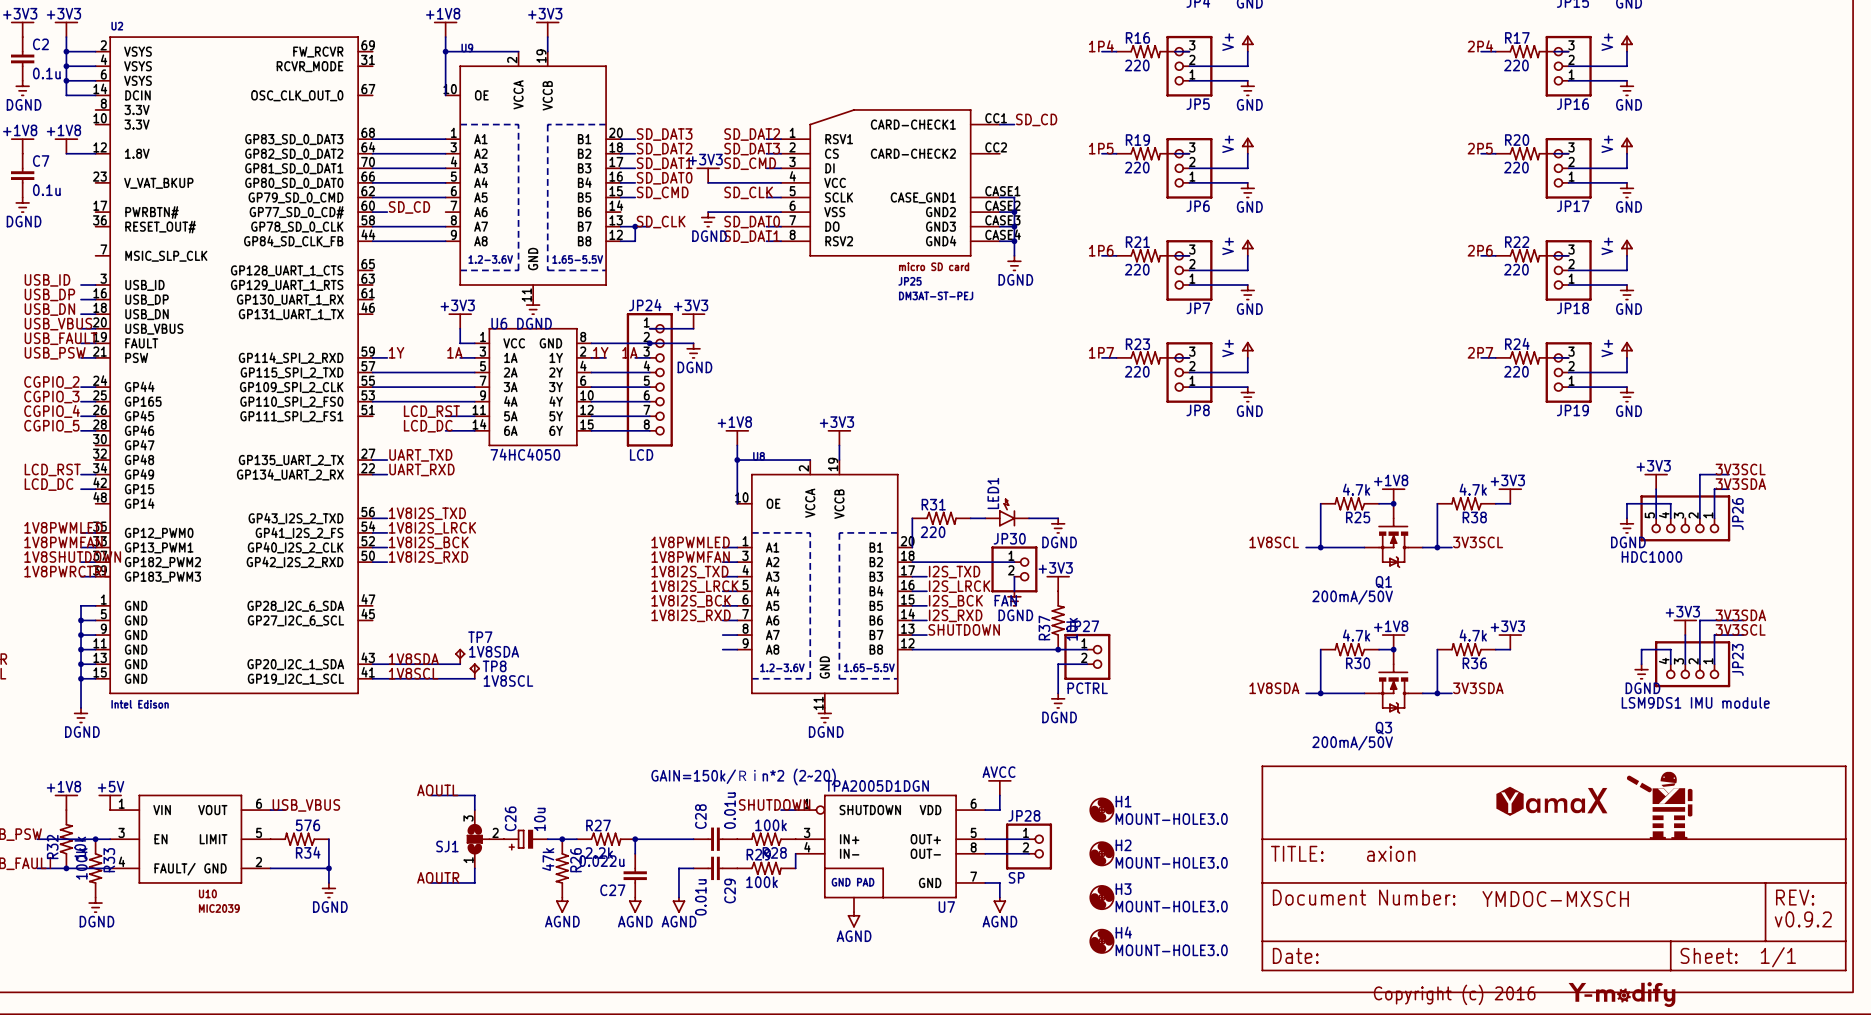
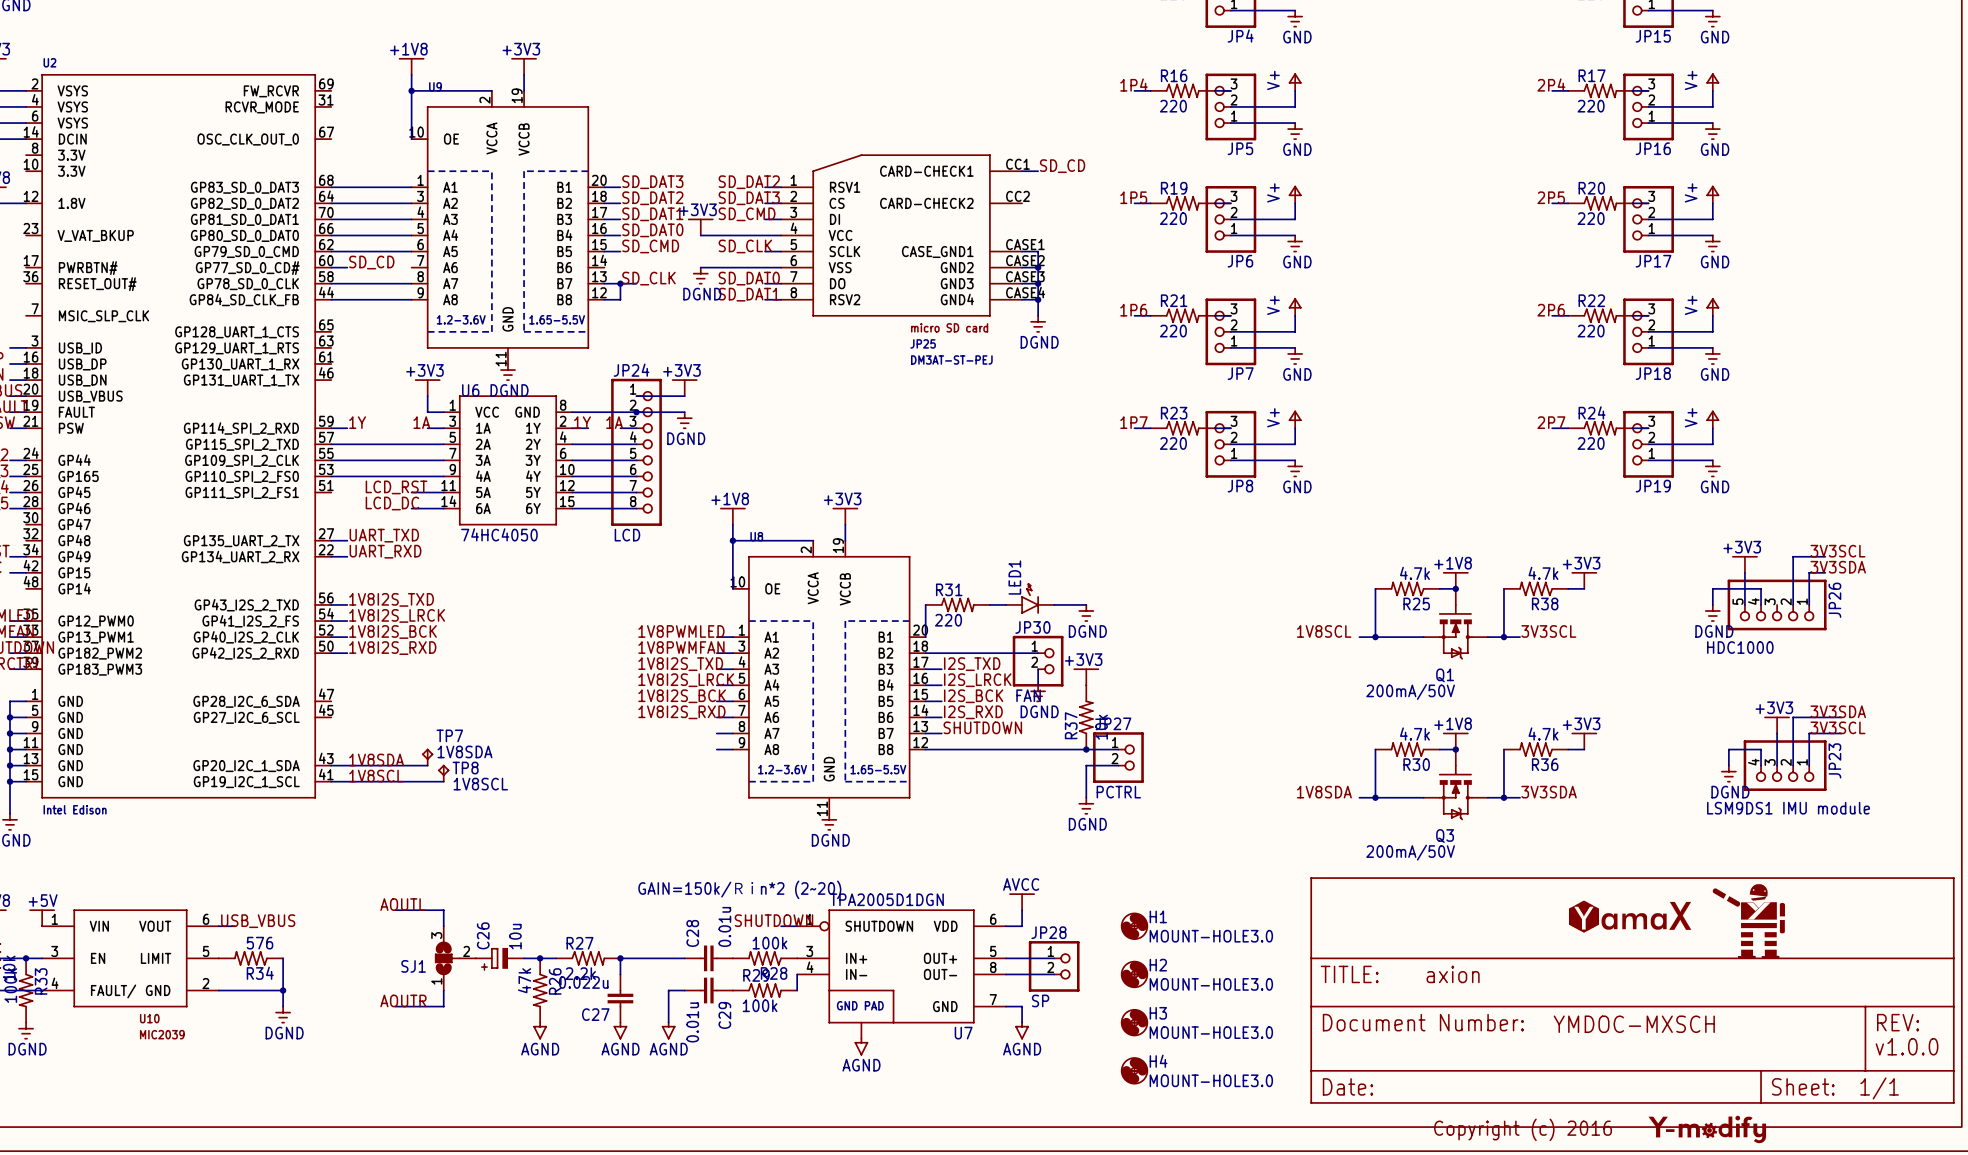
text: v0.9.2 (1803, 919) -> v1.0.0 (1907, 1046)

